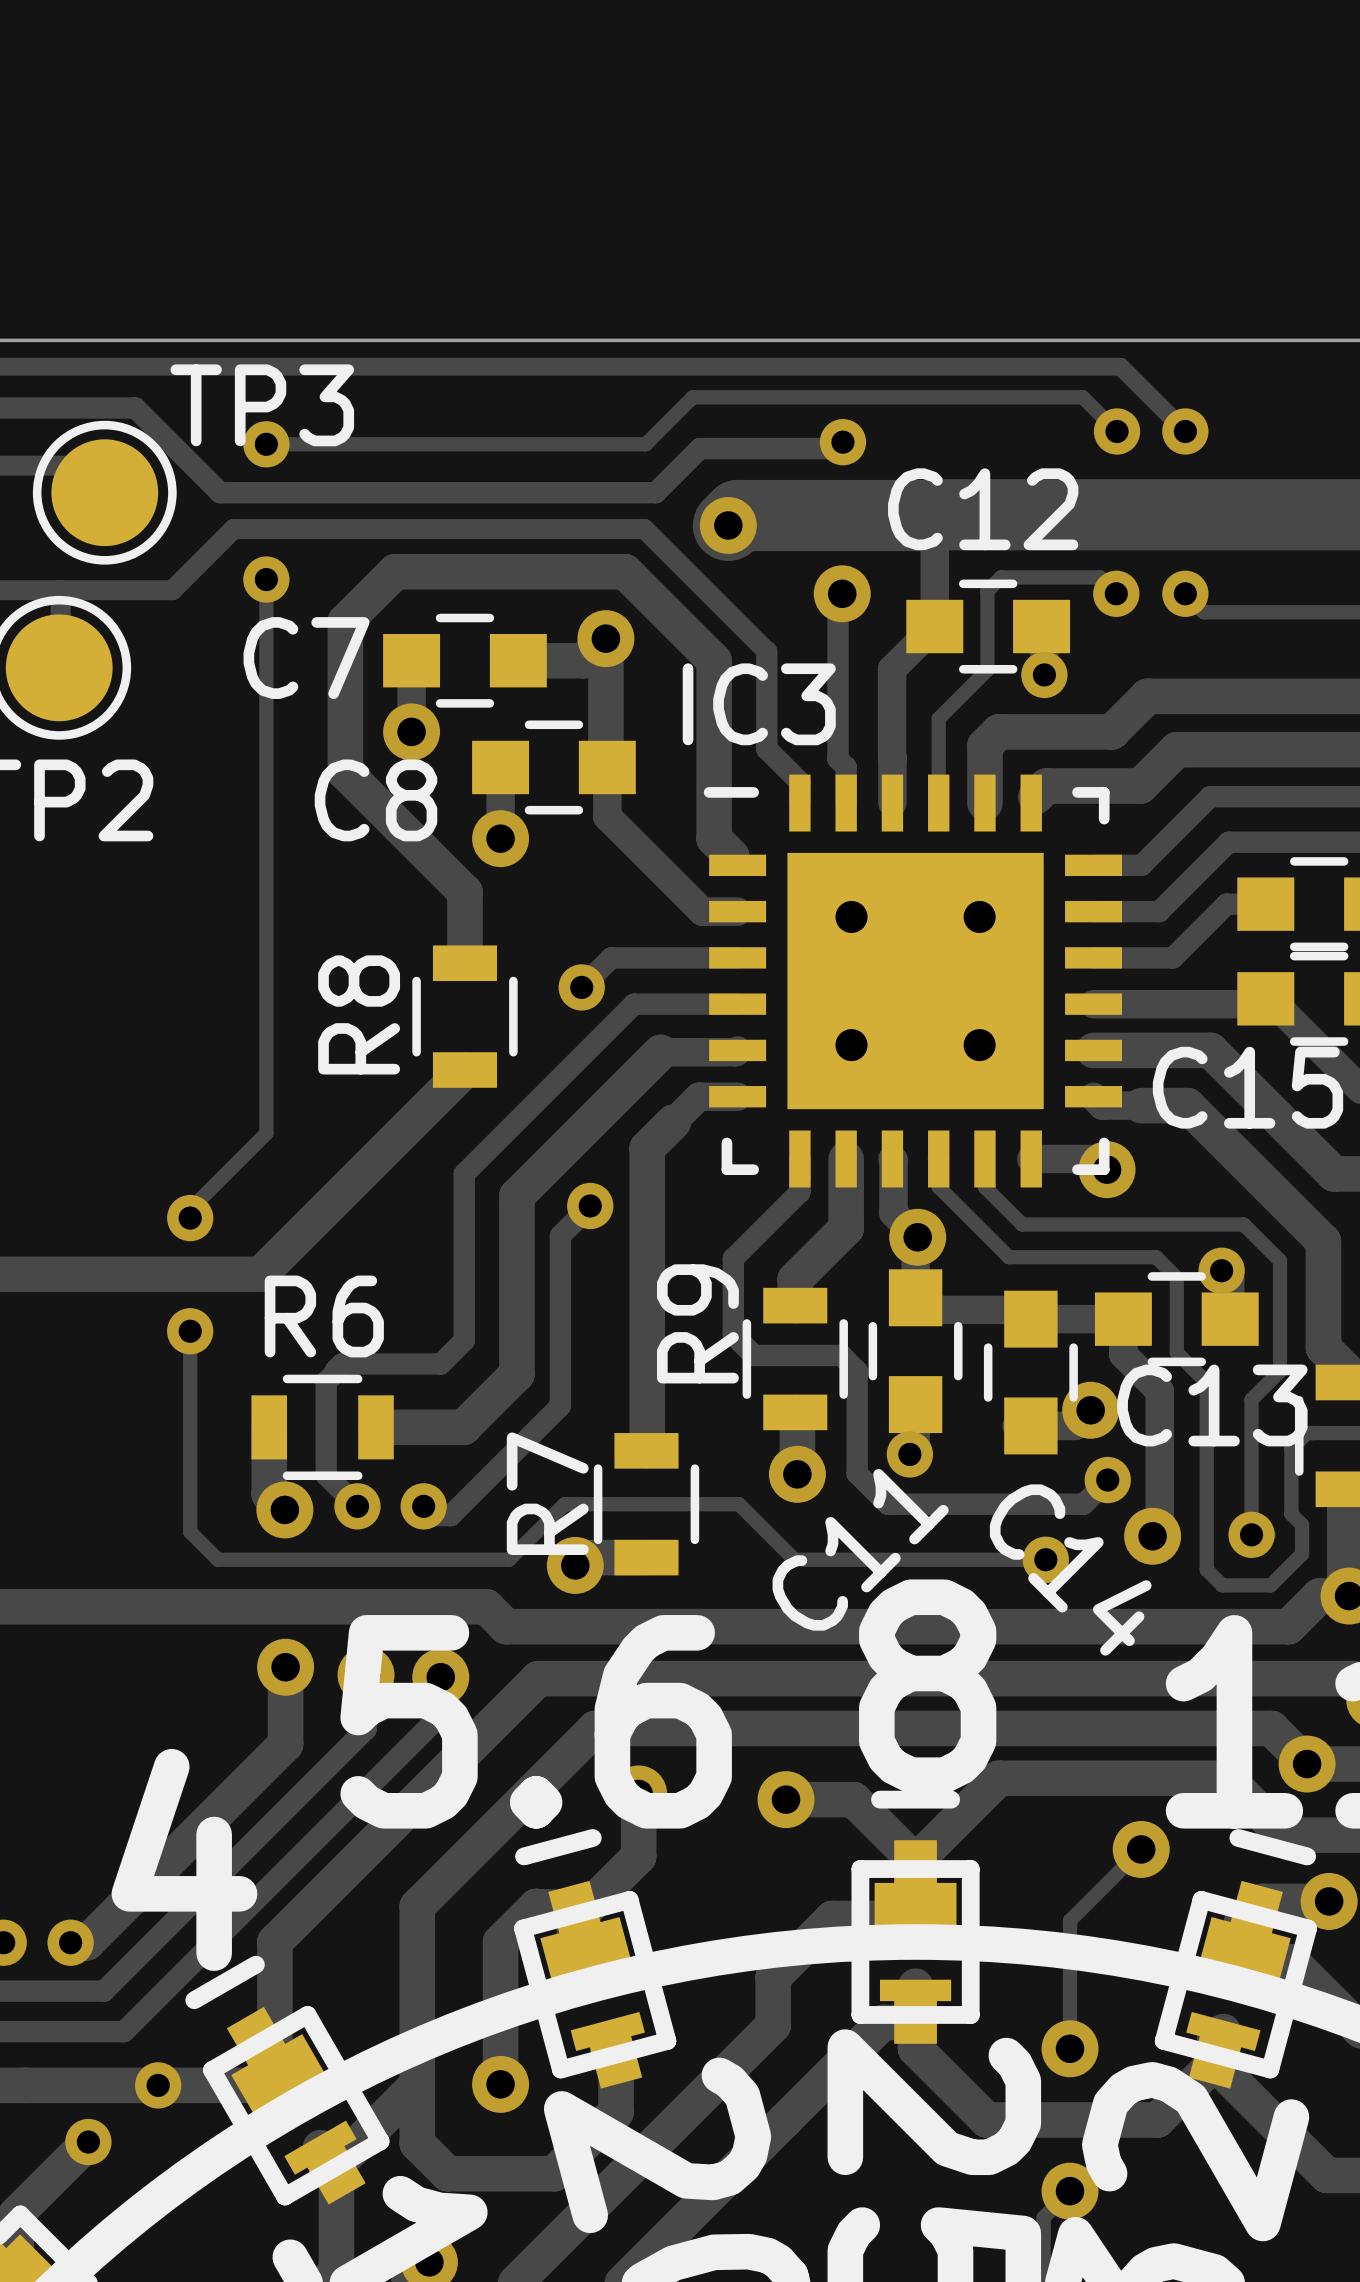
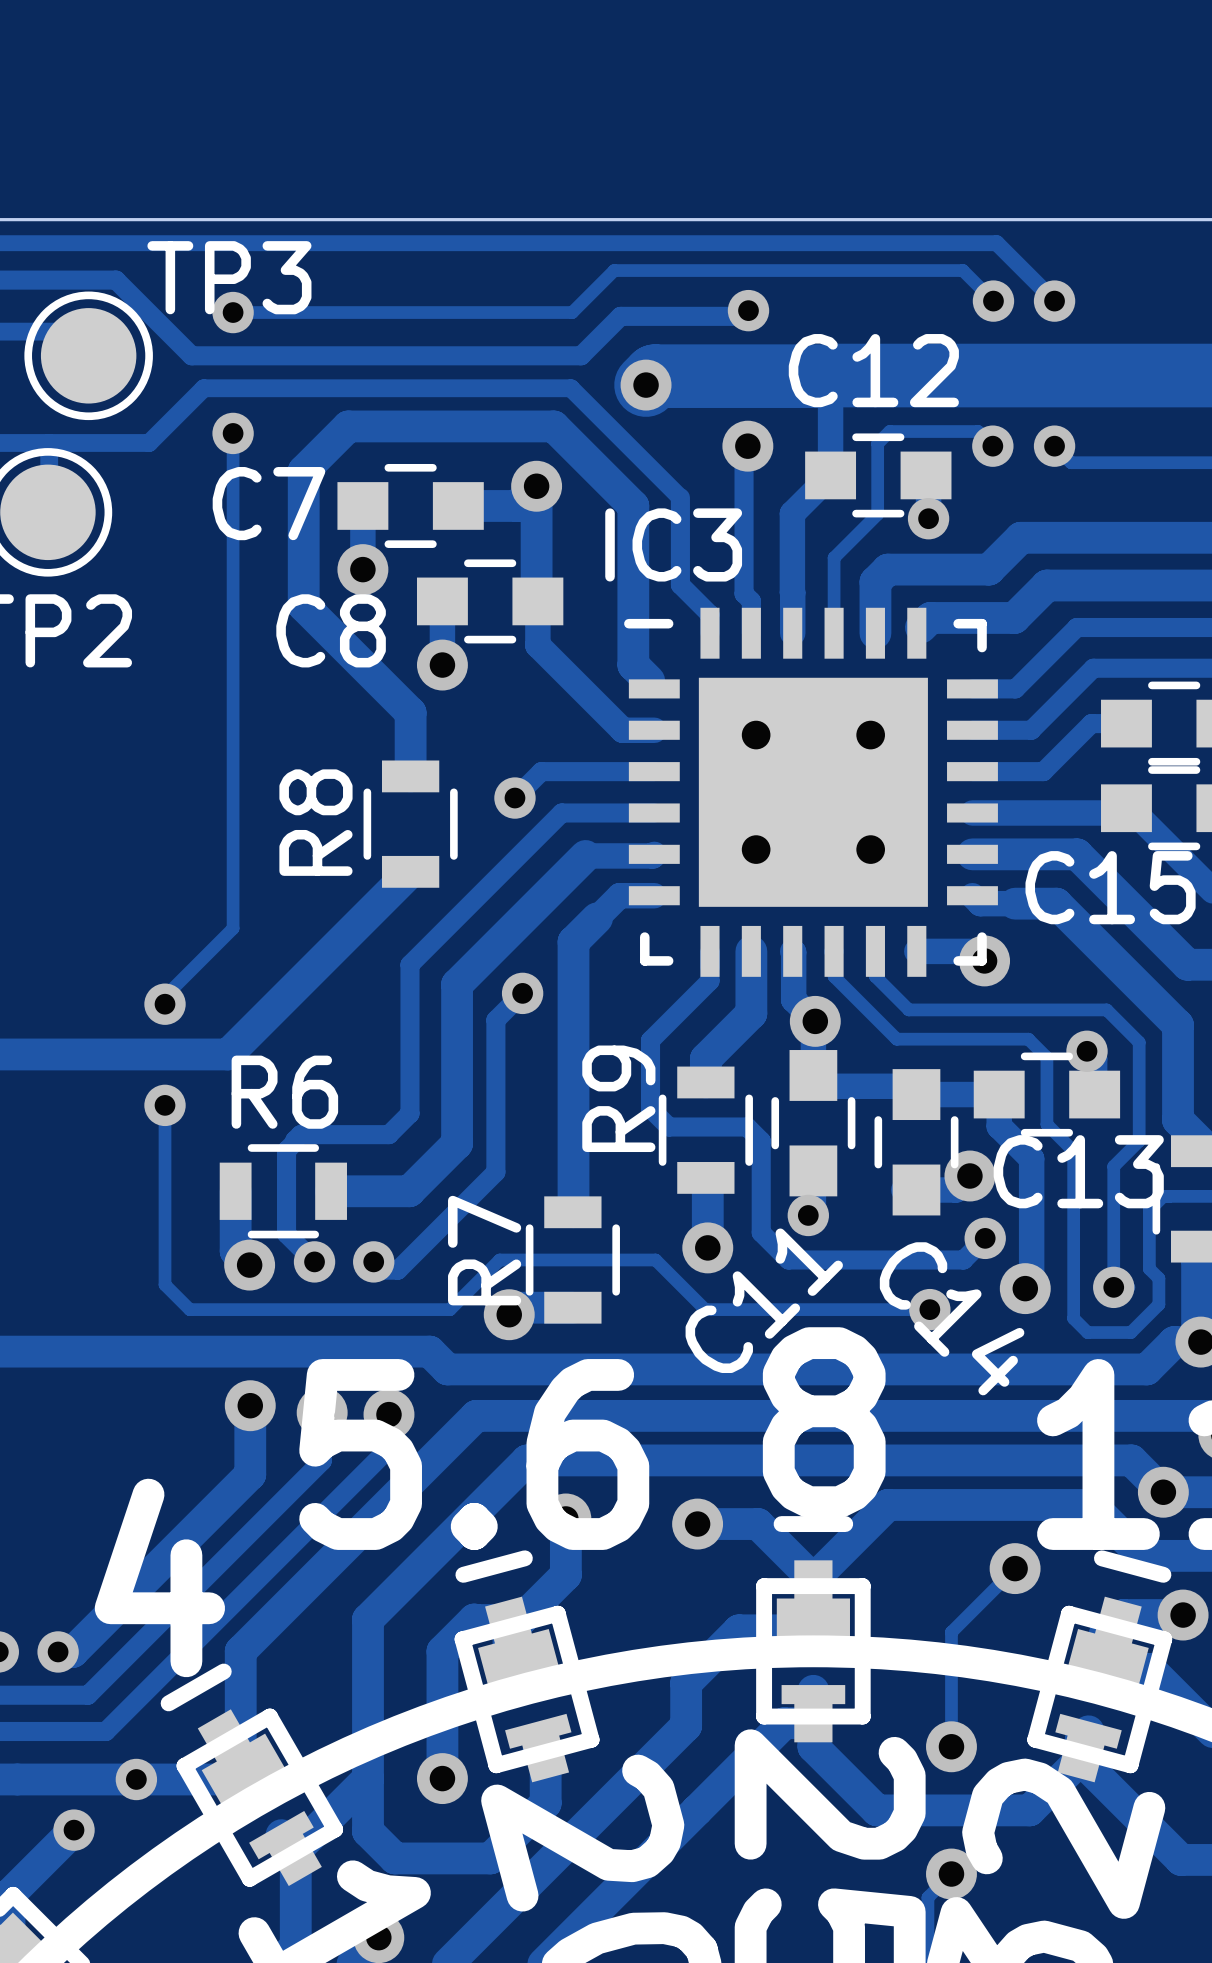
via position: (797, 1474) -> (707, 1247)

